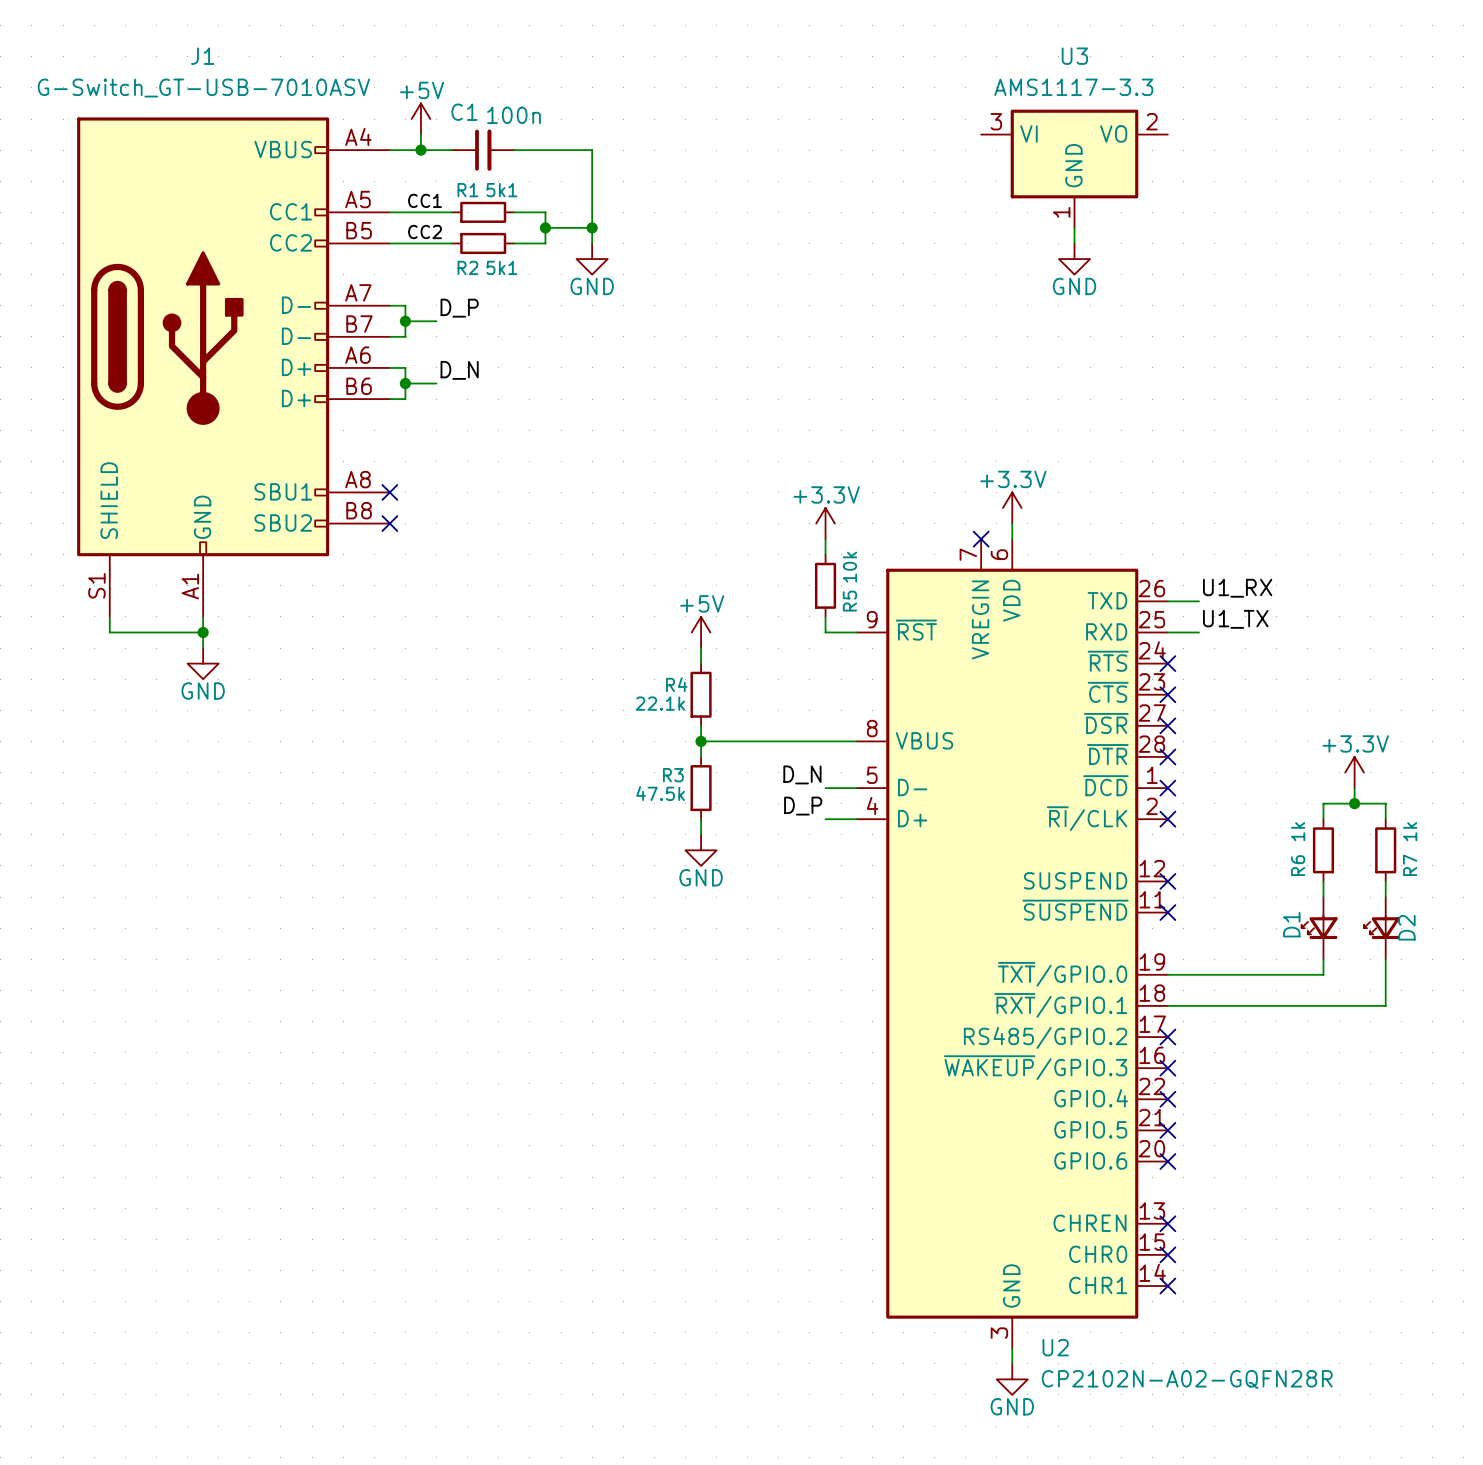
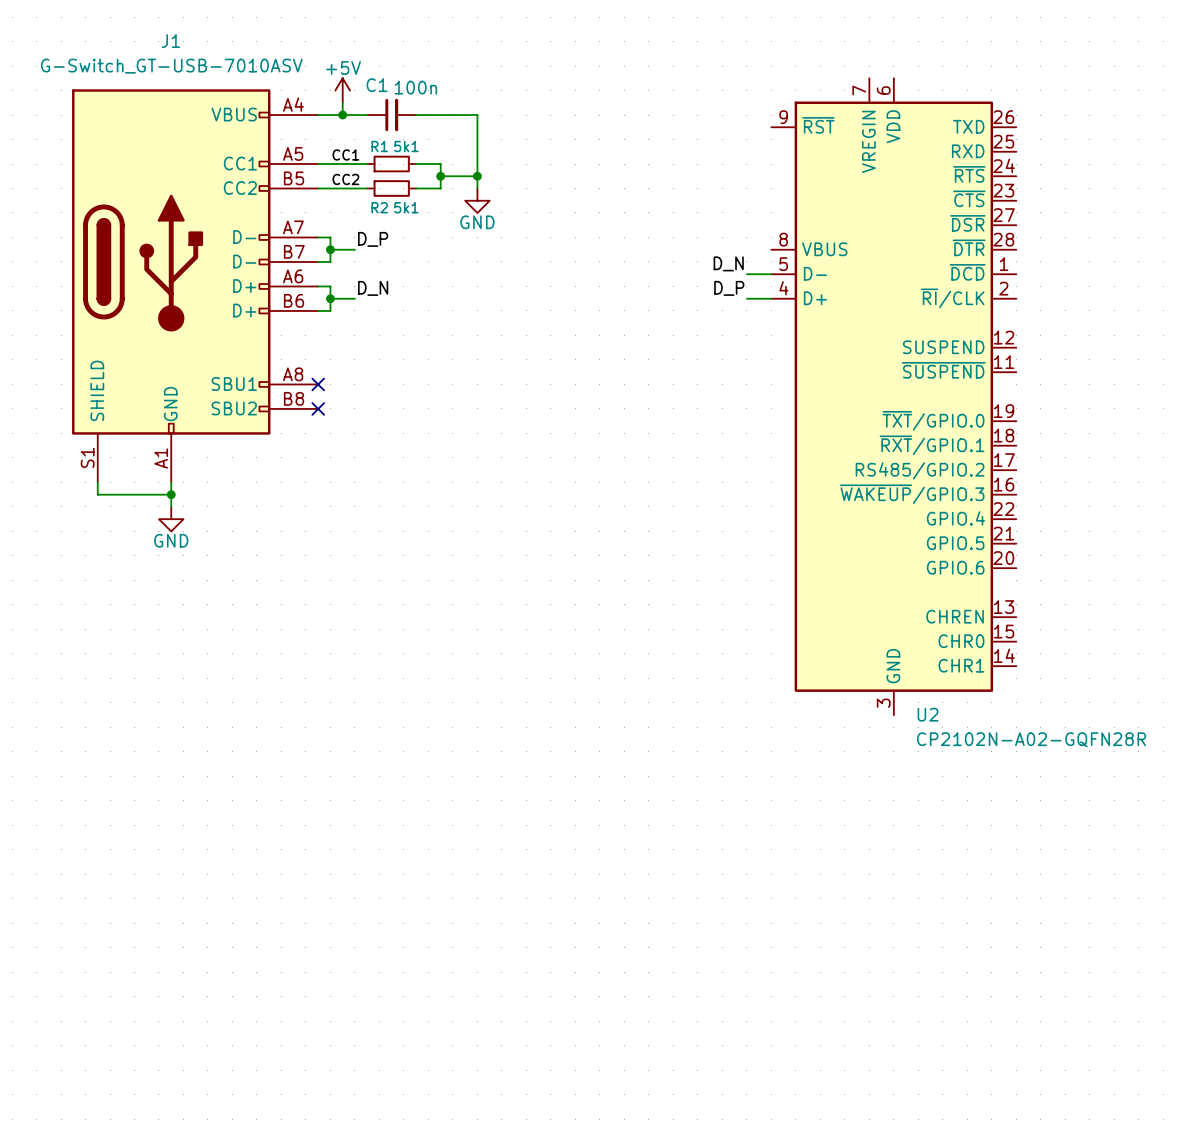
U3: AMS1117-3.3 (1074, 168) -> none
power symbol: GND (1074, 259) -> none
label: none -> D_N (728, 263)
wire: none -> (746, 274) (771, 274)
label: none -> D_P (729, 288)
wire: none -> (746, 298) (771, 298)
power symbol: +3.3V (1012, 508) -> none
power symbol: +3.3V (825, 523) -> none
wire: (825, 539) (825, 554) -> none
U2 symbol: [856, 539, 1168, 1349] -> [771, 78, 1017, 716]
no-connect mark: (981, 539) -> none
R5: 10k (825, 585) -> none
label: U1_RX (1237, 588) -> none
wire: (825, 616) (825, 632) (856, 632) -> none
label: U1_TX (1235, 619) -> none
power symbol: +5V (701, 632) -> none
wire: (701, 648) (701, 663) -> none
no-connect mark: (1167, 663) -> none
R4: 22.1k (701, 694) -> none
no-connect mark: (1167, 694) -> none
wire: (701, 725) (701, 756) -> none
no-connect mark: (1167, 725) -> none
wire: (701, 741) (856, 741) -> none
junction: (701, 741) -> none
no-connect mark: (1167, 756) -> none
power symbol: +3.3V (1354, 772) -> none
label: D_N (802, 774) -> none
R3: 47.5k (701, 788) -> none
wire: (825, 788) (856, 788) -> none
no-connect mark: (1167, 788) -> none
wire: (1354, 788) (1354, 803) -> none
junction: (1354, 803) -> none
label: D_P (803, 806) -> none
wire: (701, 819) (701, 834) -> none
wire: (825, 819) (856, 819) -> none
no-connect mark: (1167, 819) -> none
wire: (1323, 819) (1323, 803) (1385, 803) (1385, 819) -> none
power symbol: GND (701, 850) -> none
R6: 1k (1323, 850) -> none
R7: 1k (1385, 850) -> none
no-connect mark: (1167, 881) -> none
wire: (1323, 881) (1323, 897) -> none
wire: (1385, 881) (1385, 897) -> none
no-connect mark: (1167, 912) -> none
D1: (1319, 928) -> none
D2: (1381, 928) -> none
wire: (1323, 959) (1323, 974) (1167, 974) -> none
wire: (1385, 959) (1385, 1005) (1167, 1005) -> none
no-connect mark: (1167, 1037) -> none
no-connect mark: (1167, 1068) -> none
no-connect mark: (1167, 1099) -> none
no-connect mark: (1167, 1130) -> none
no-connect mark: (1167, 1161) -> none
no-connect mark: (1167, 1223) -> none
no-connect mark: (1167, 1254) -> none
no-connect mark: (1167, 1286) -> none
wire: (1012, 1348) (1012, 1363) -> none
power symbol: GND (1012, 1379) -> none

